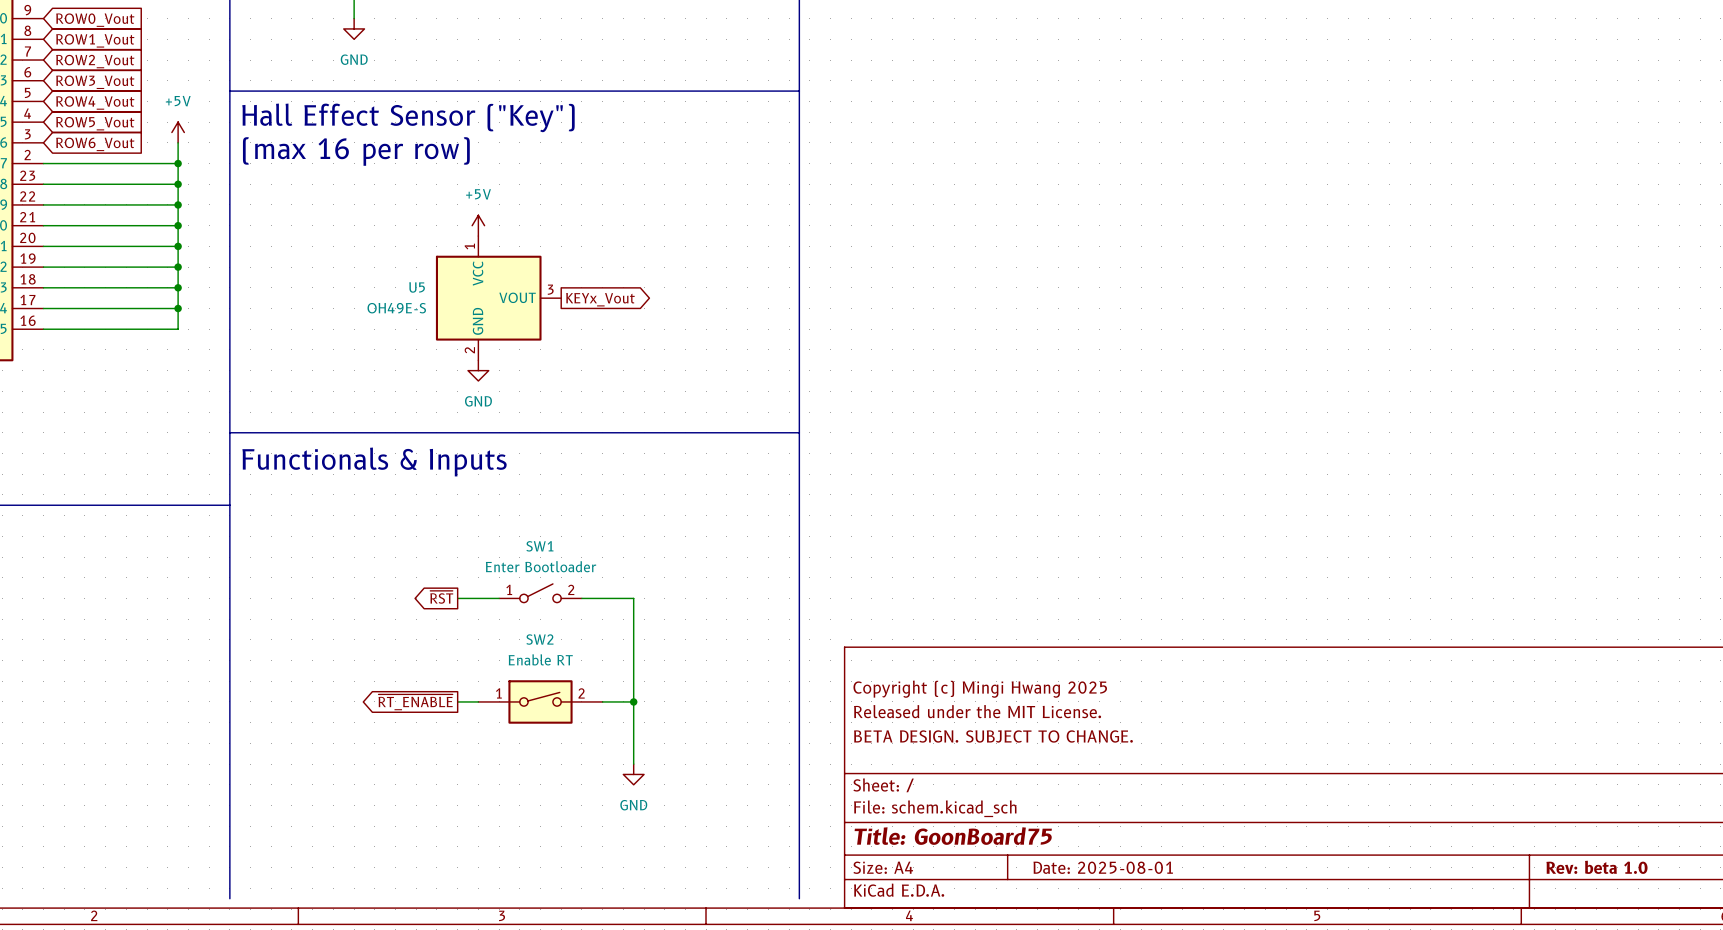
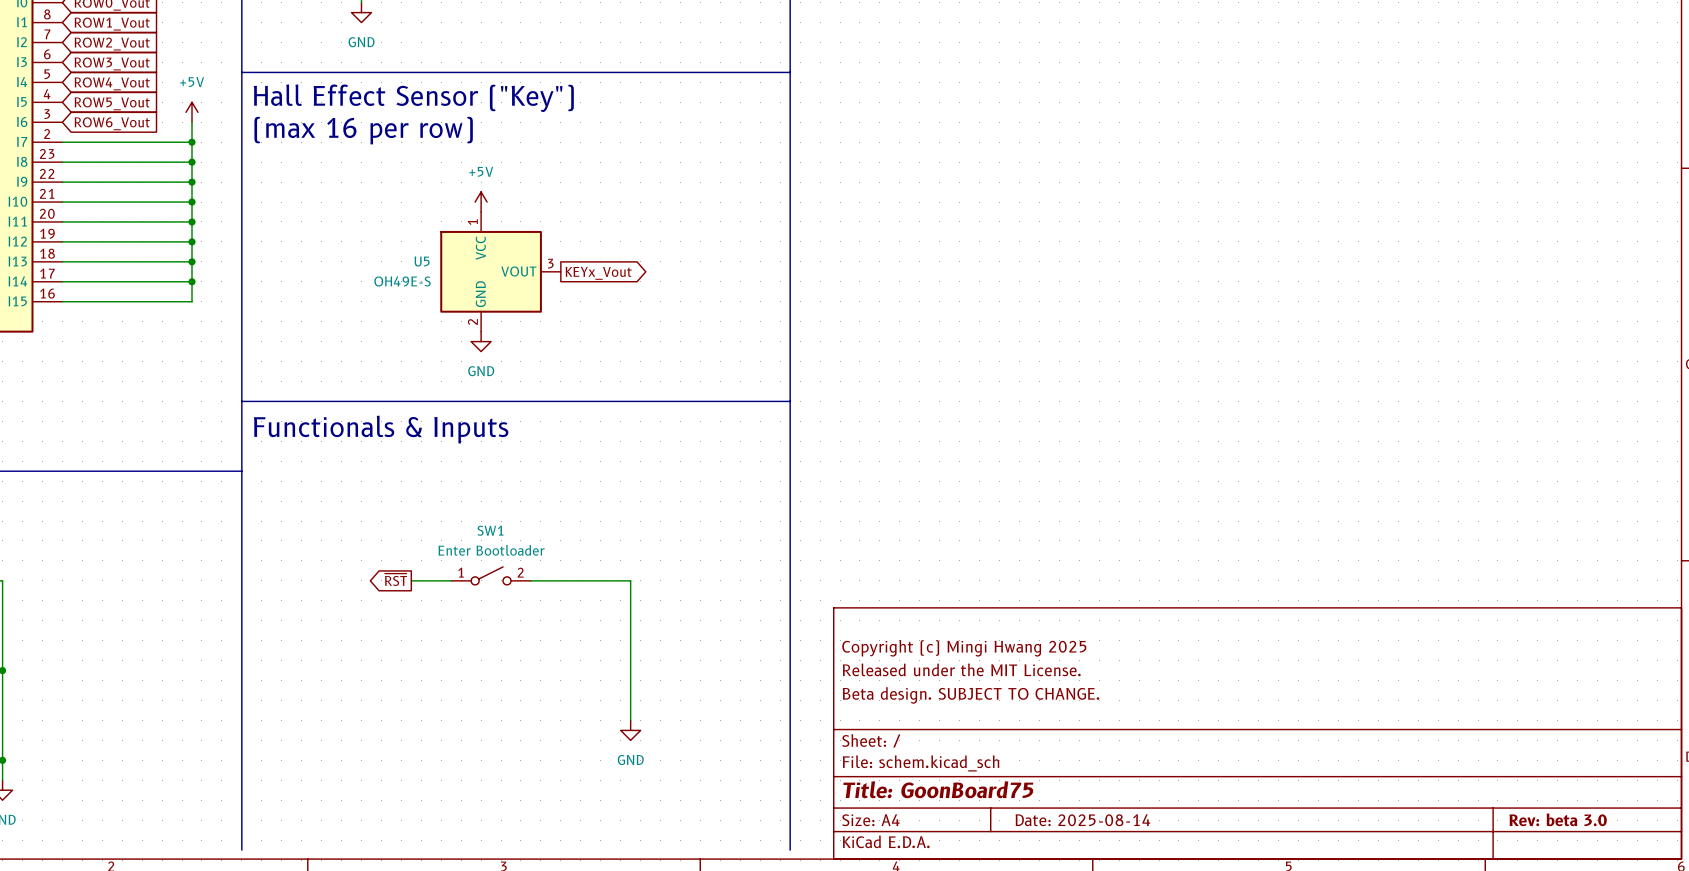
SW1 position: (540, 593) -> (491, 575)
global label position: ~{RST} (441, 597) -> ~{RST} (396, 579)
wire: (457, 598) (499, 598) -> (411, 580) (451, 580)
wire: (581, 598) (633, 598) (633, 619) -> (530, 580) (630, 580)
wire: (457, 701) (478, 701) -> none
SW2: Enable RT (540, 701) -> none
wire: (602, 701) (633, 701) -> none
junction: (633, 701) -> none
global label: ~{RT_ENABLE} (415, 702) -> none
title block: BETA DESIGN. SUBJECT TO CHANGE. (993, 736) -> Beta design. SUBJECT TO CHANGE. (971, 695)
title block: Date: 2025-08-01 (1103, 867) -> Date: 2025-08-14 (1082, 820)
title block: Rev: beta 1.0 (1596, 867) -> Rev: beta 3.0 (1558, 819)

